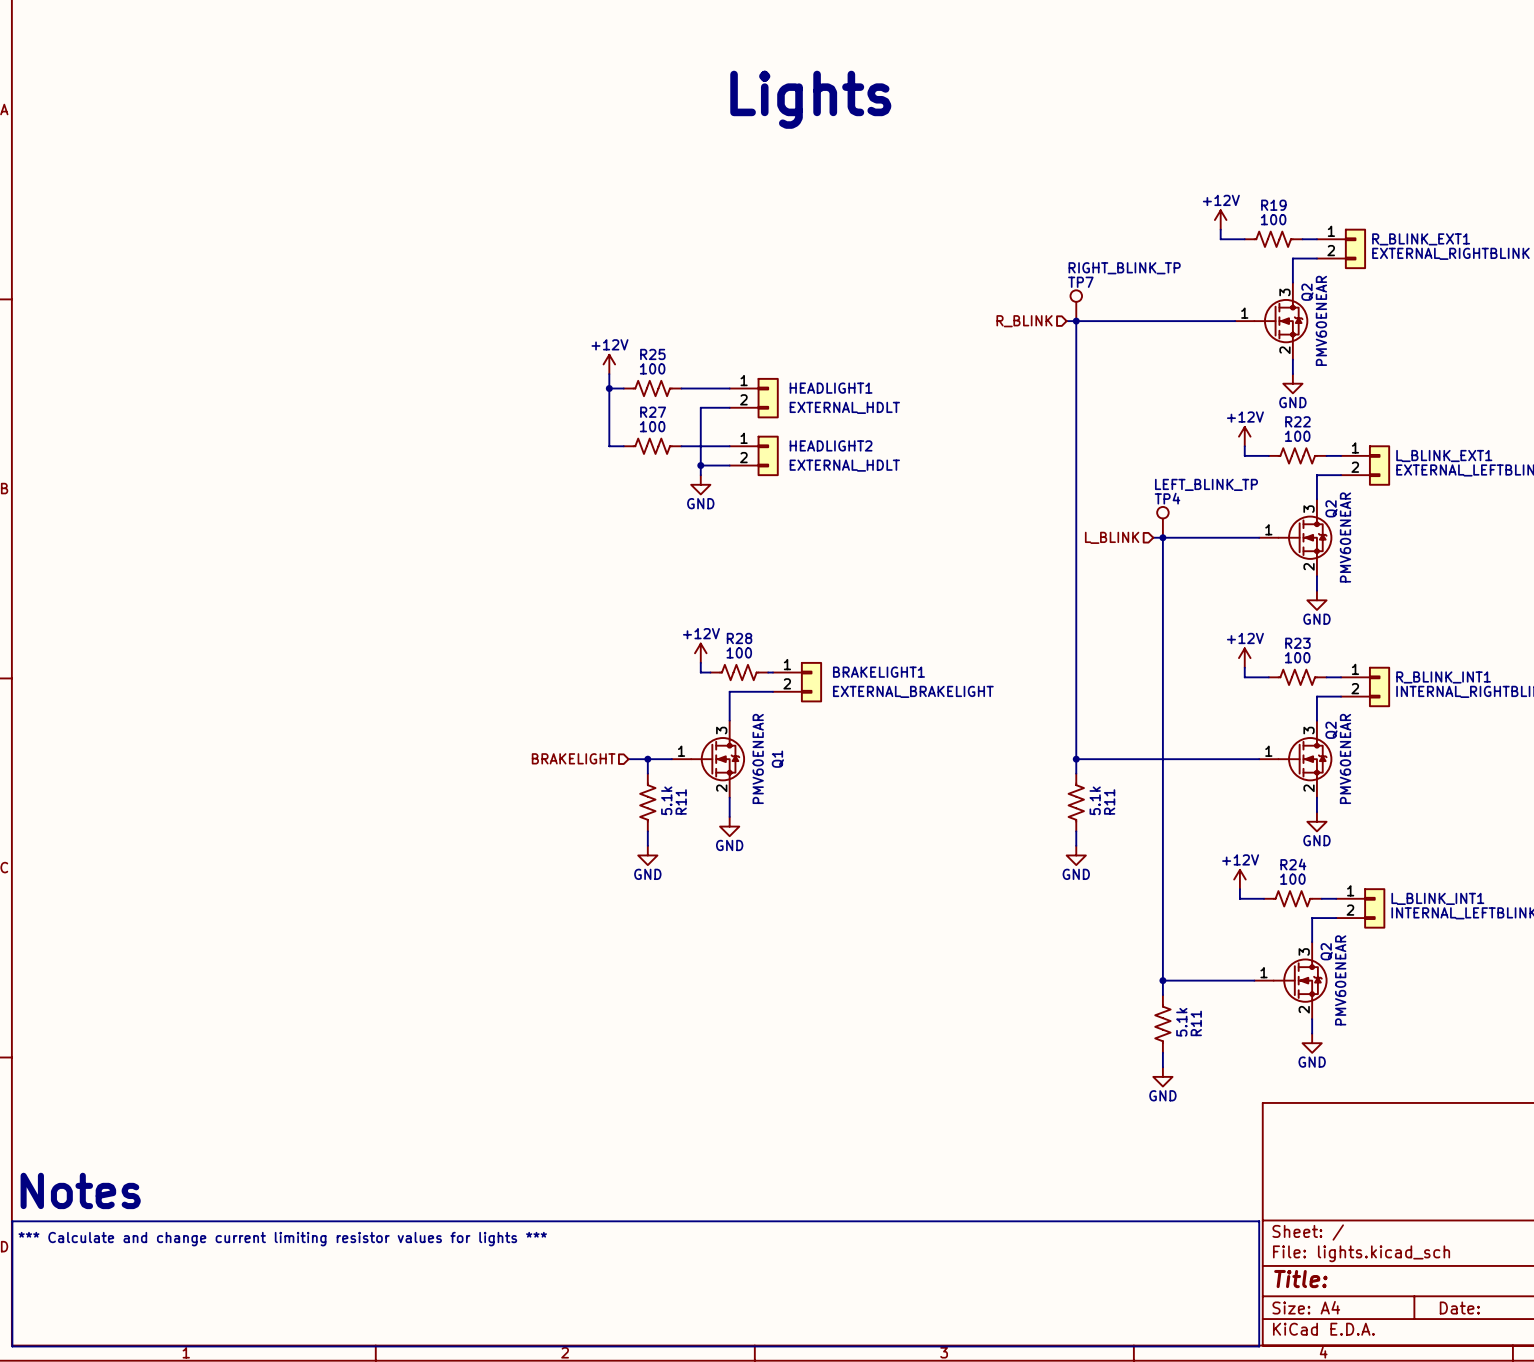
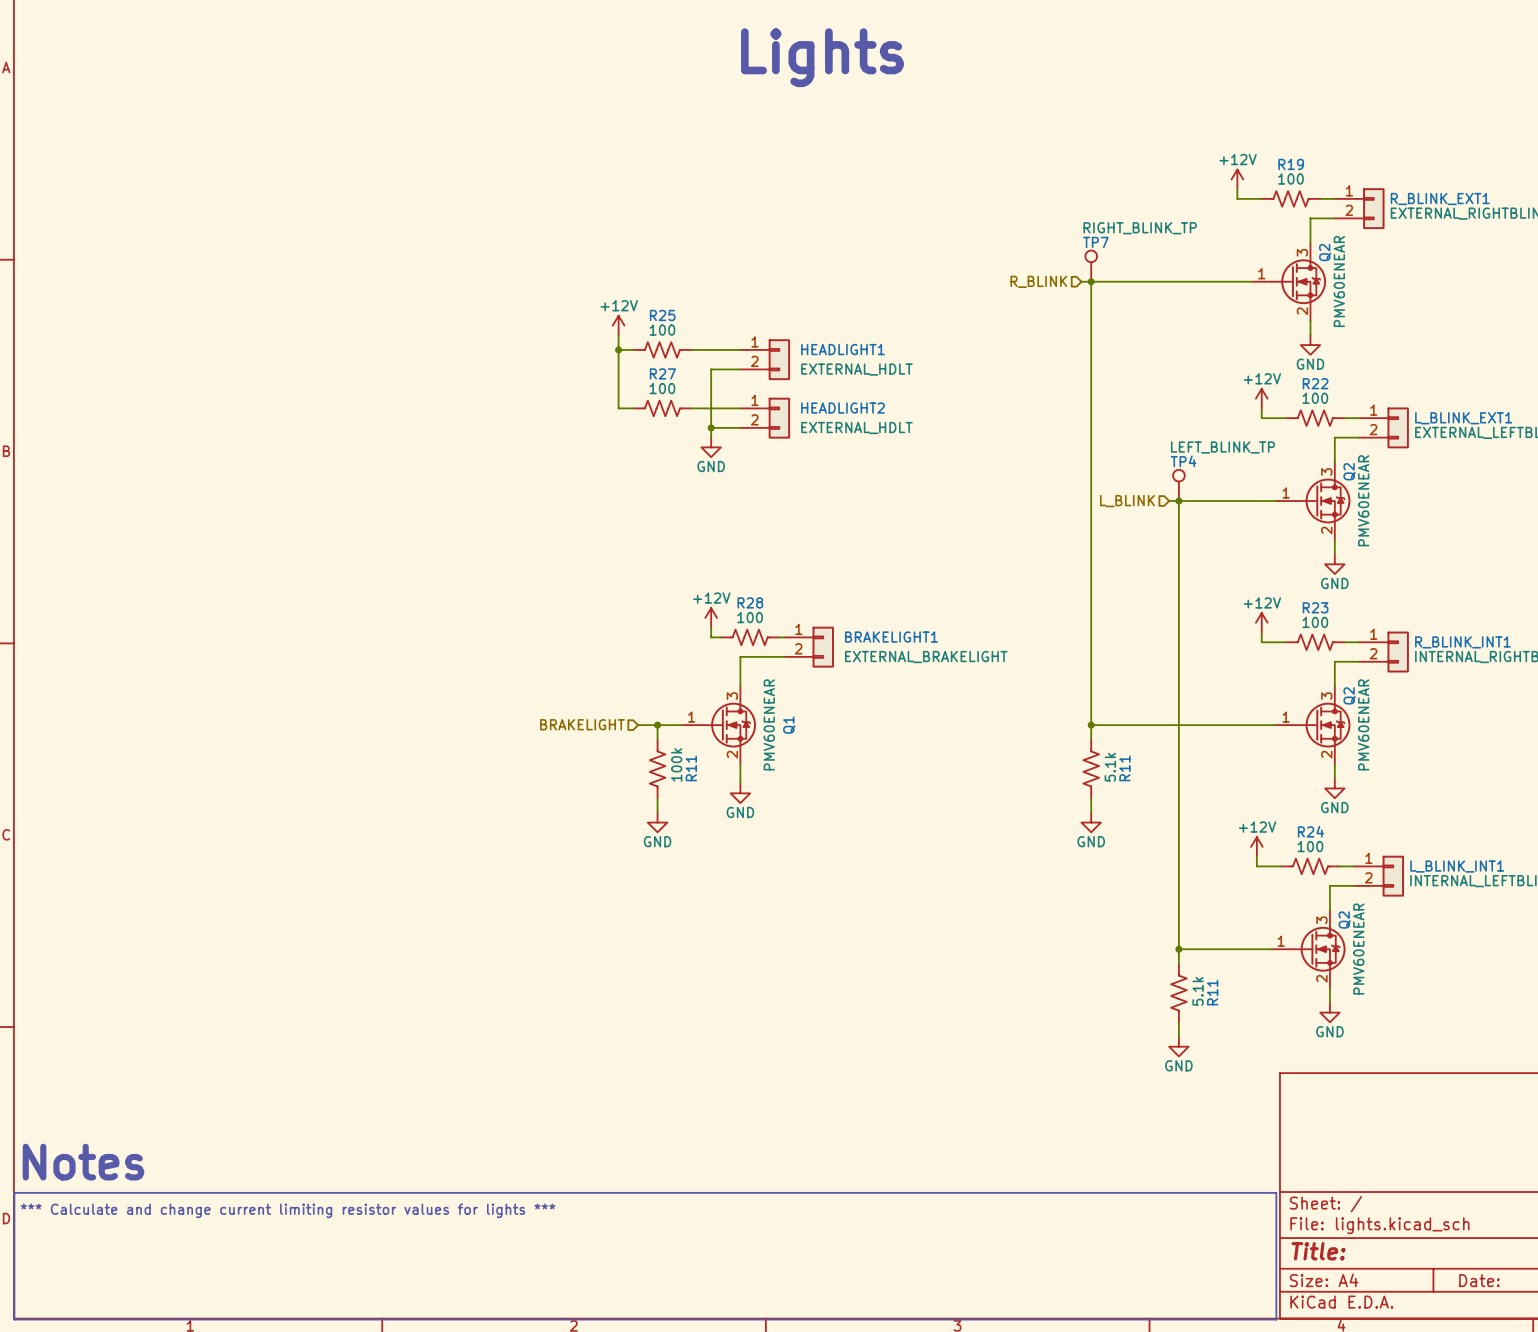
R11 value: 5.1k (666, 800) -> 100k (676, 764)

